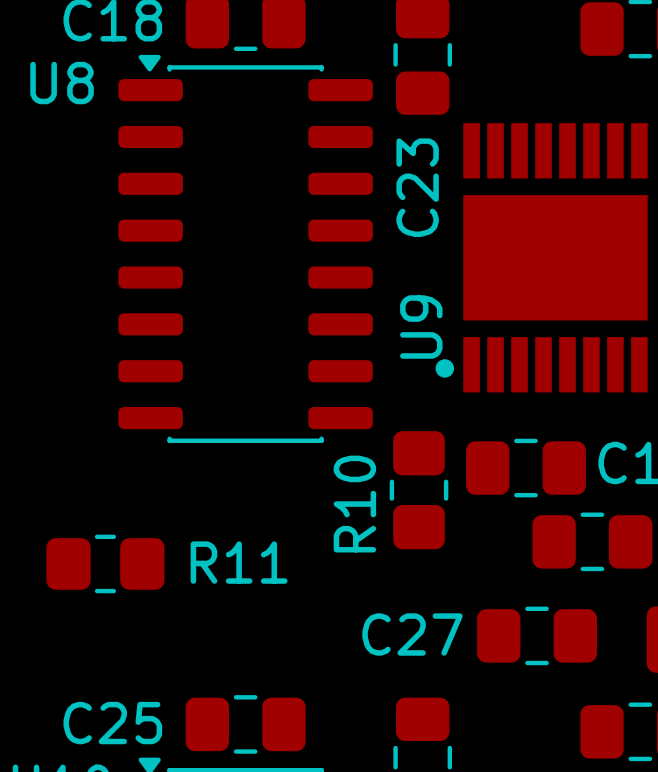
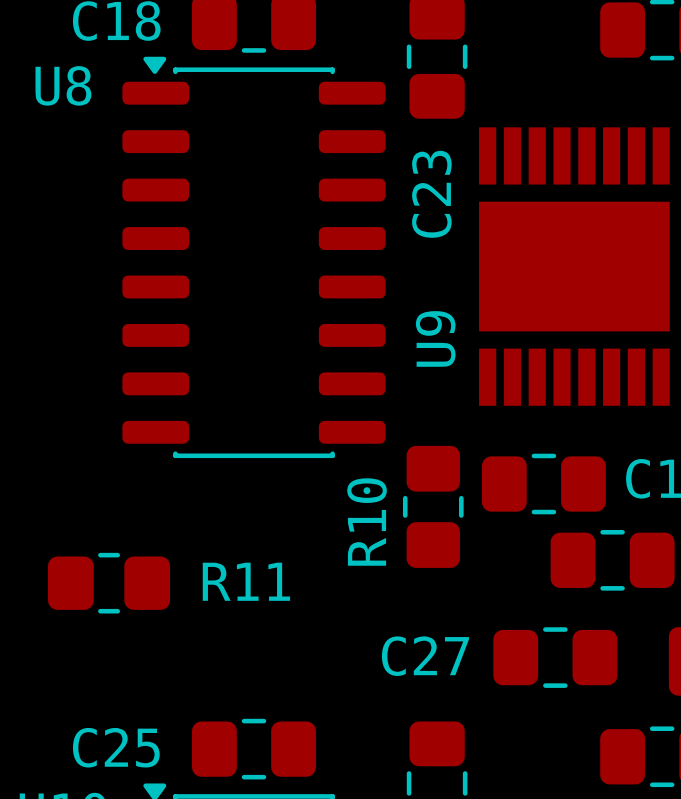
U9 footprint: [435, 123, 648, 393] -> [479, 127, 670, 406]

